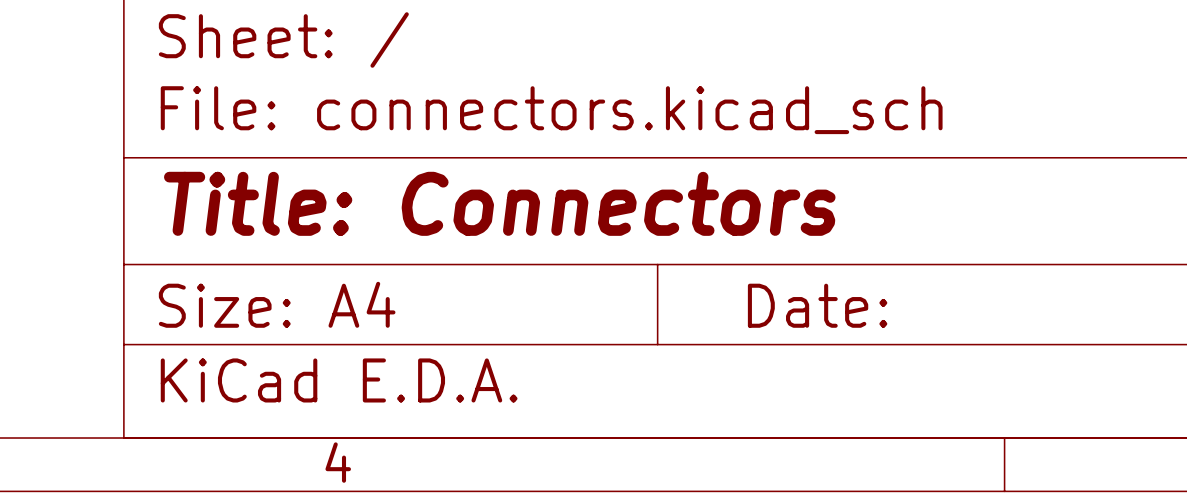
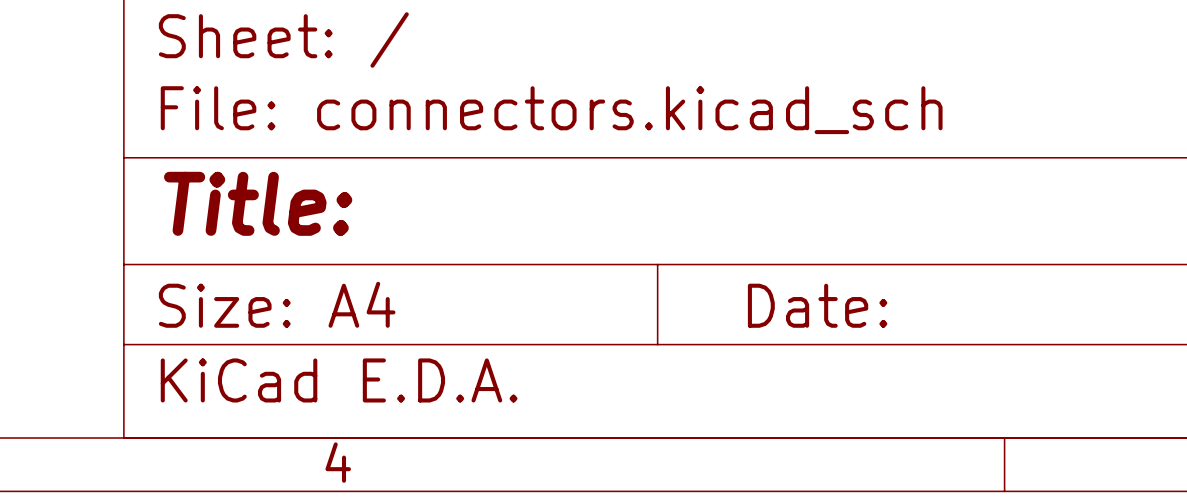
title block: Title: Connectors (499, 203) -> Title: (258, 203)

